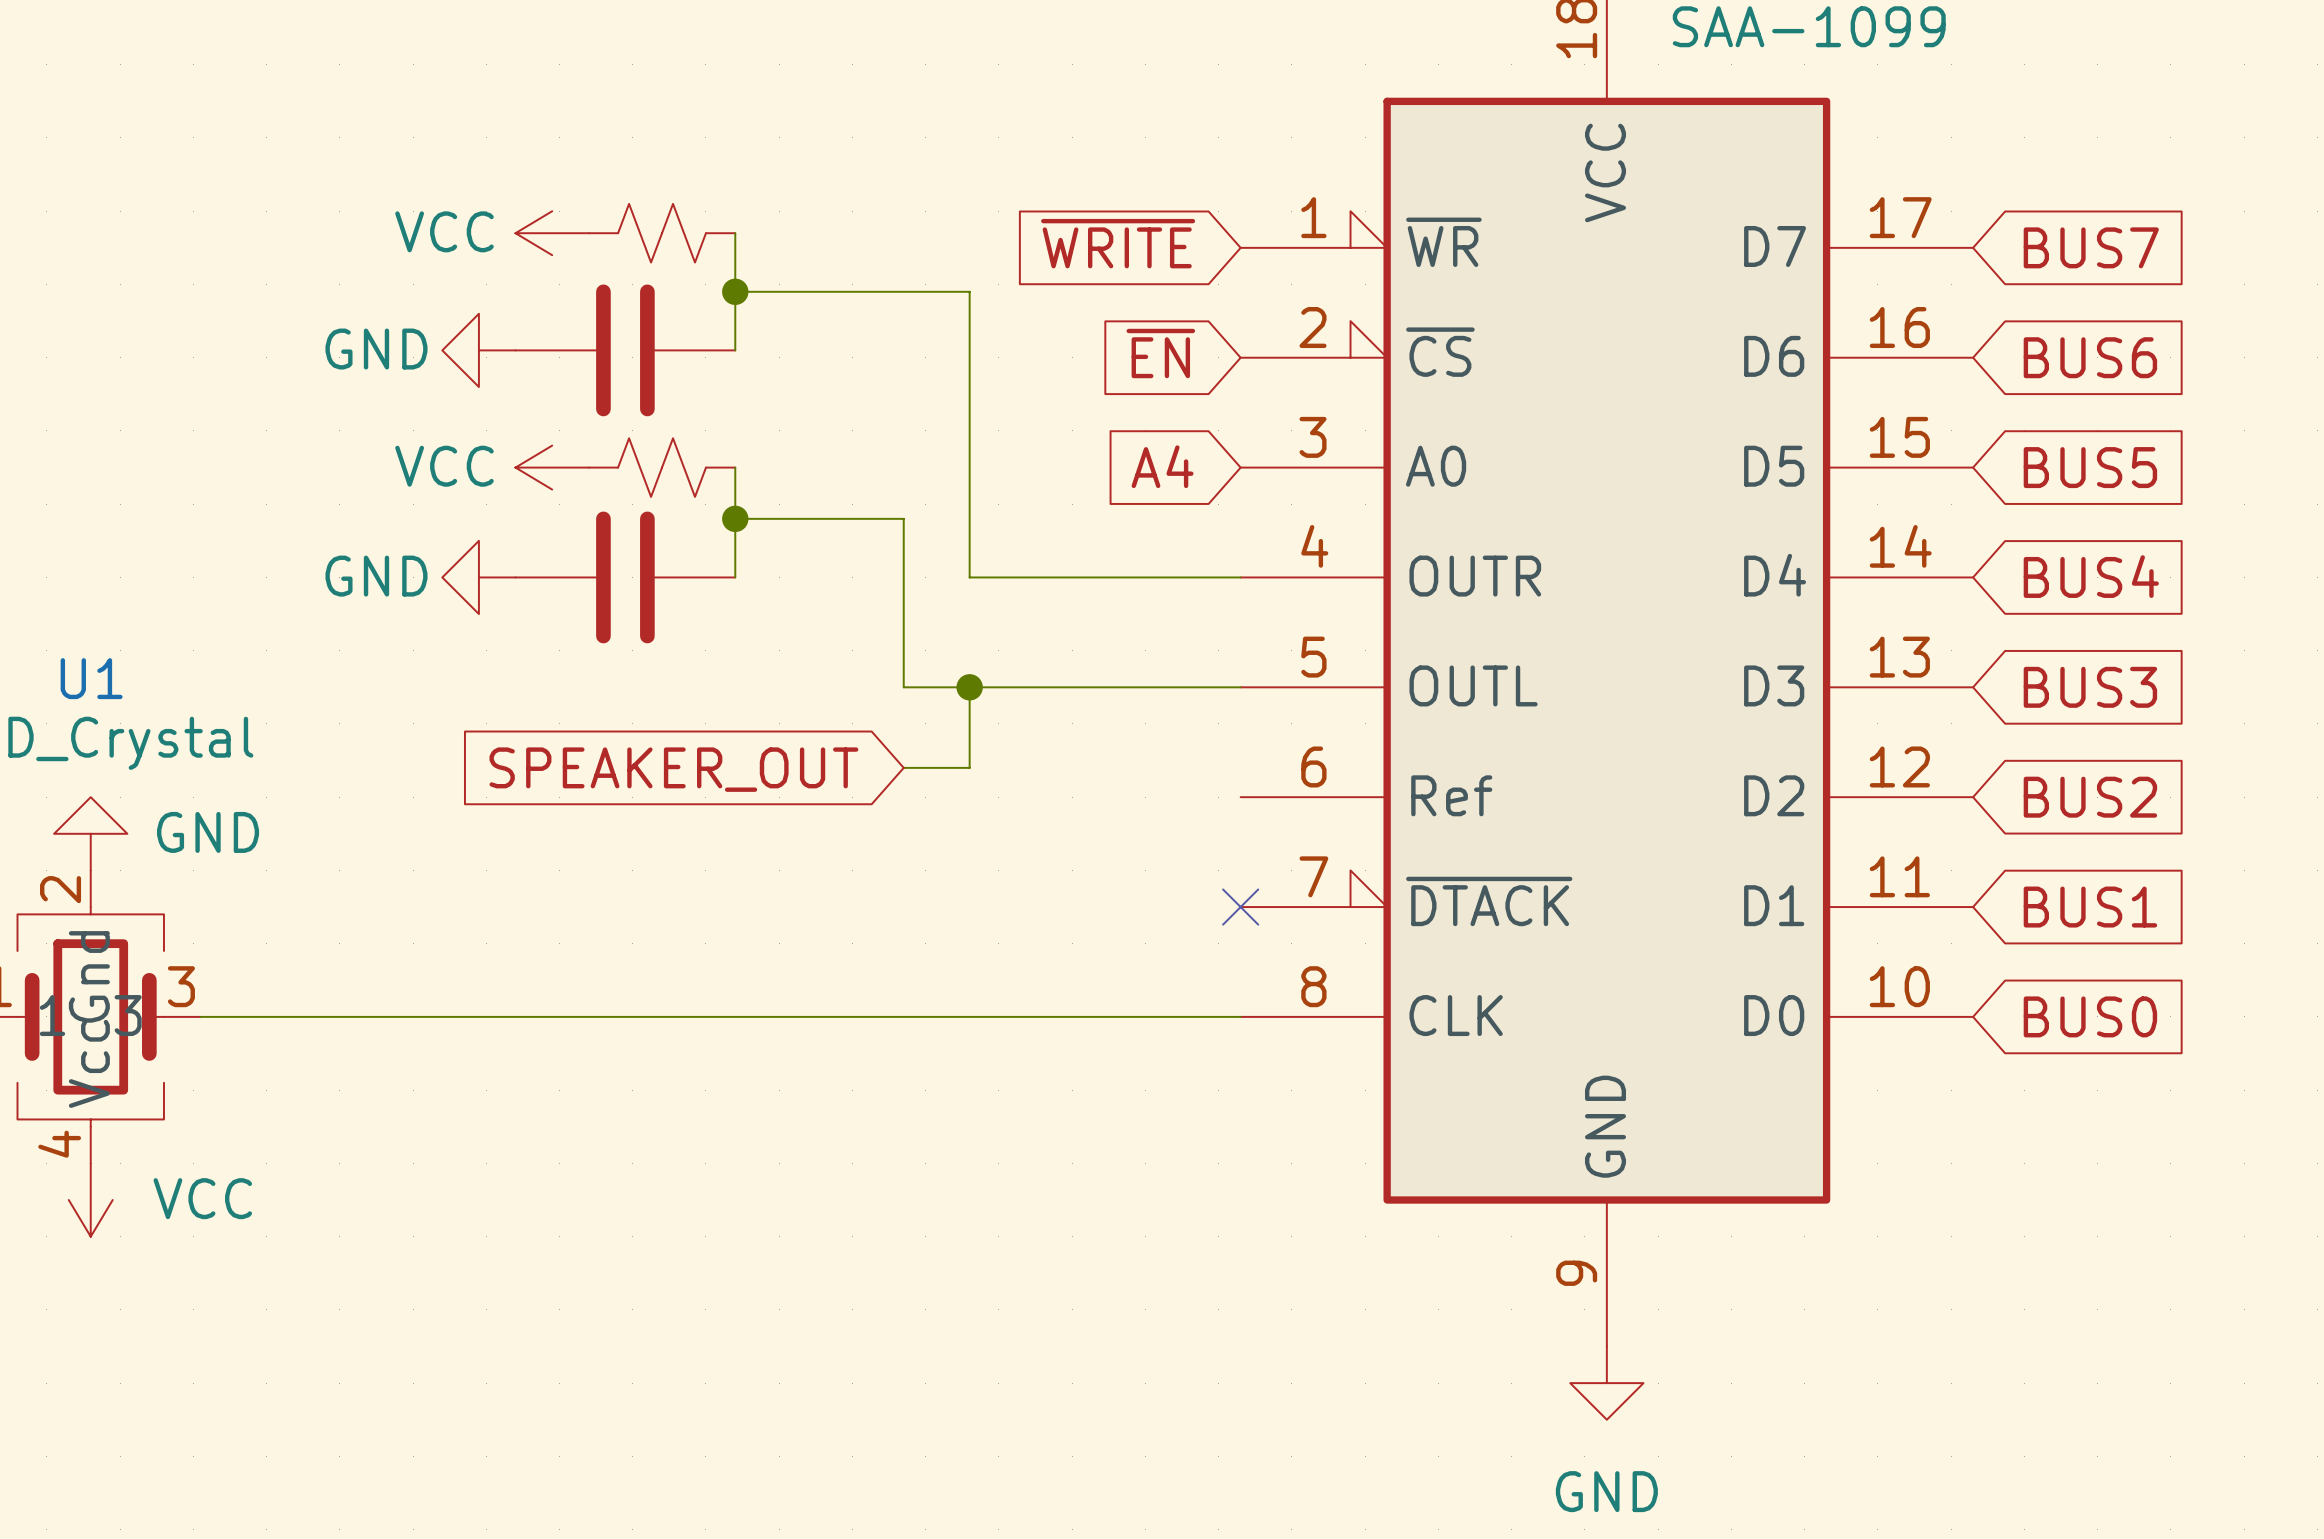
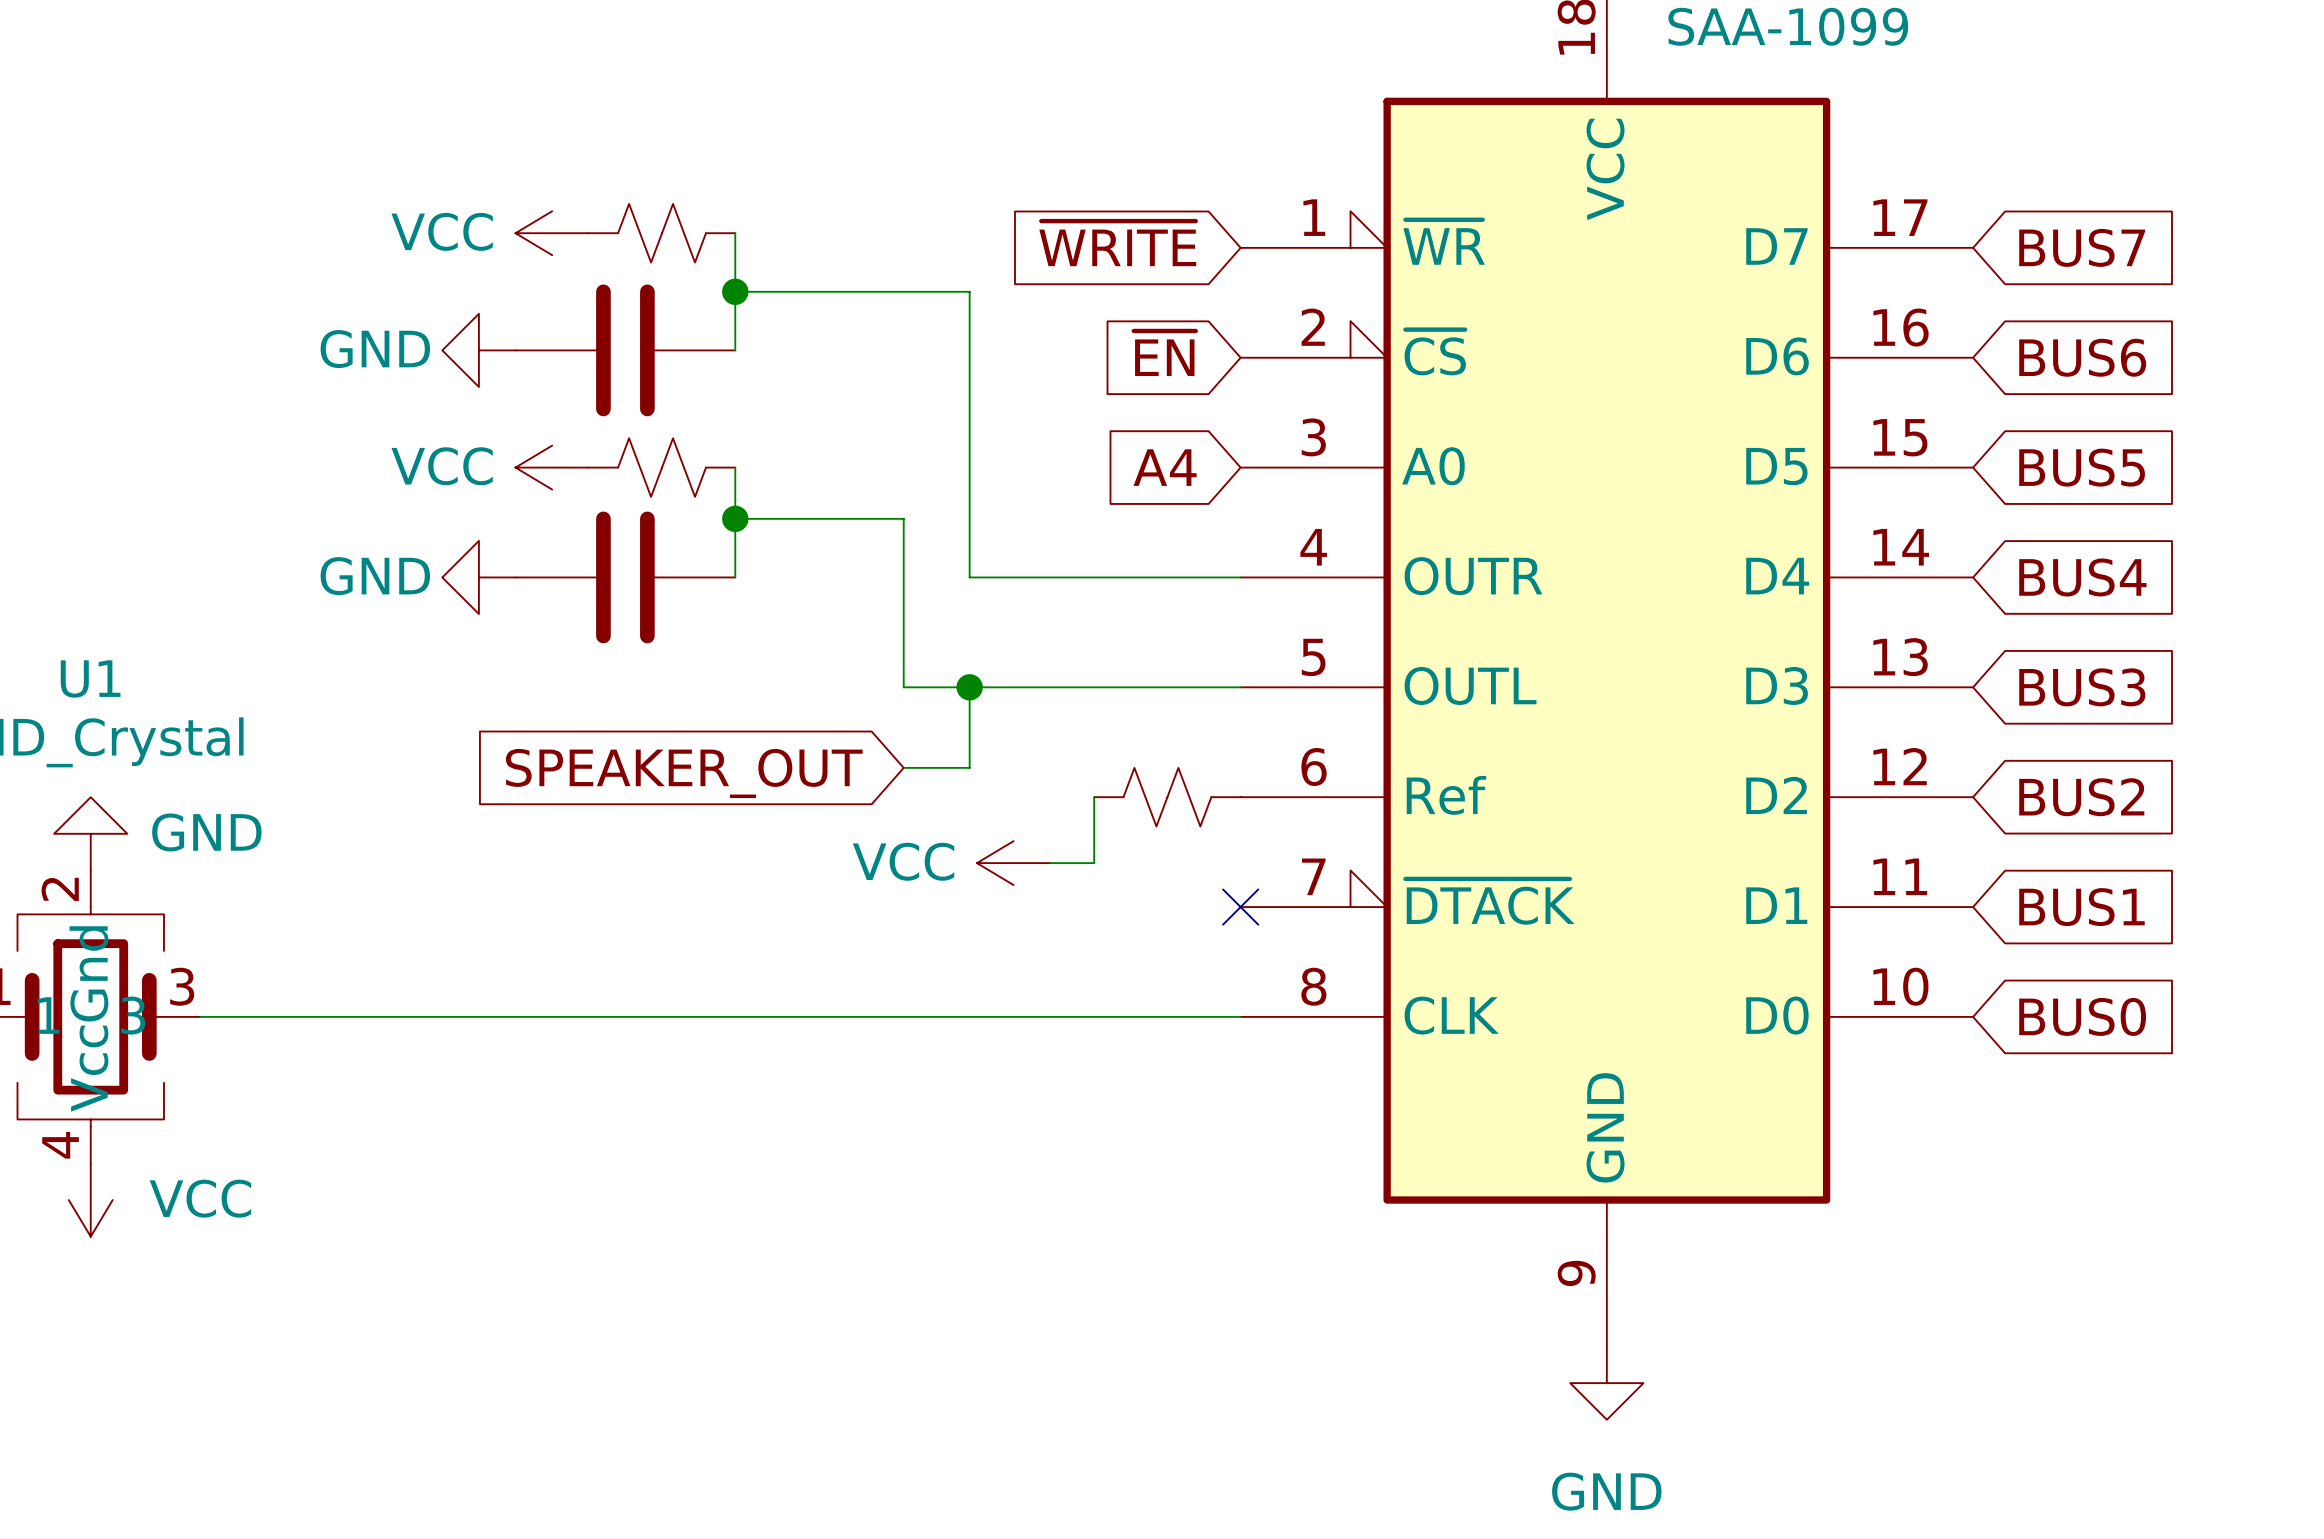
wire: none -> (1094, 797) (1094, 863) (1050, 863)
part: none -> (1167, 797)
power symbol: none -> VCC (1013, 863)

